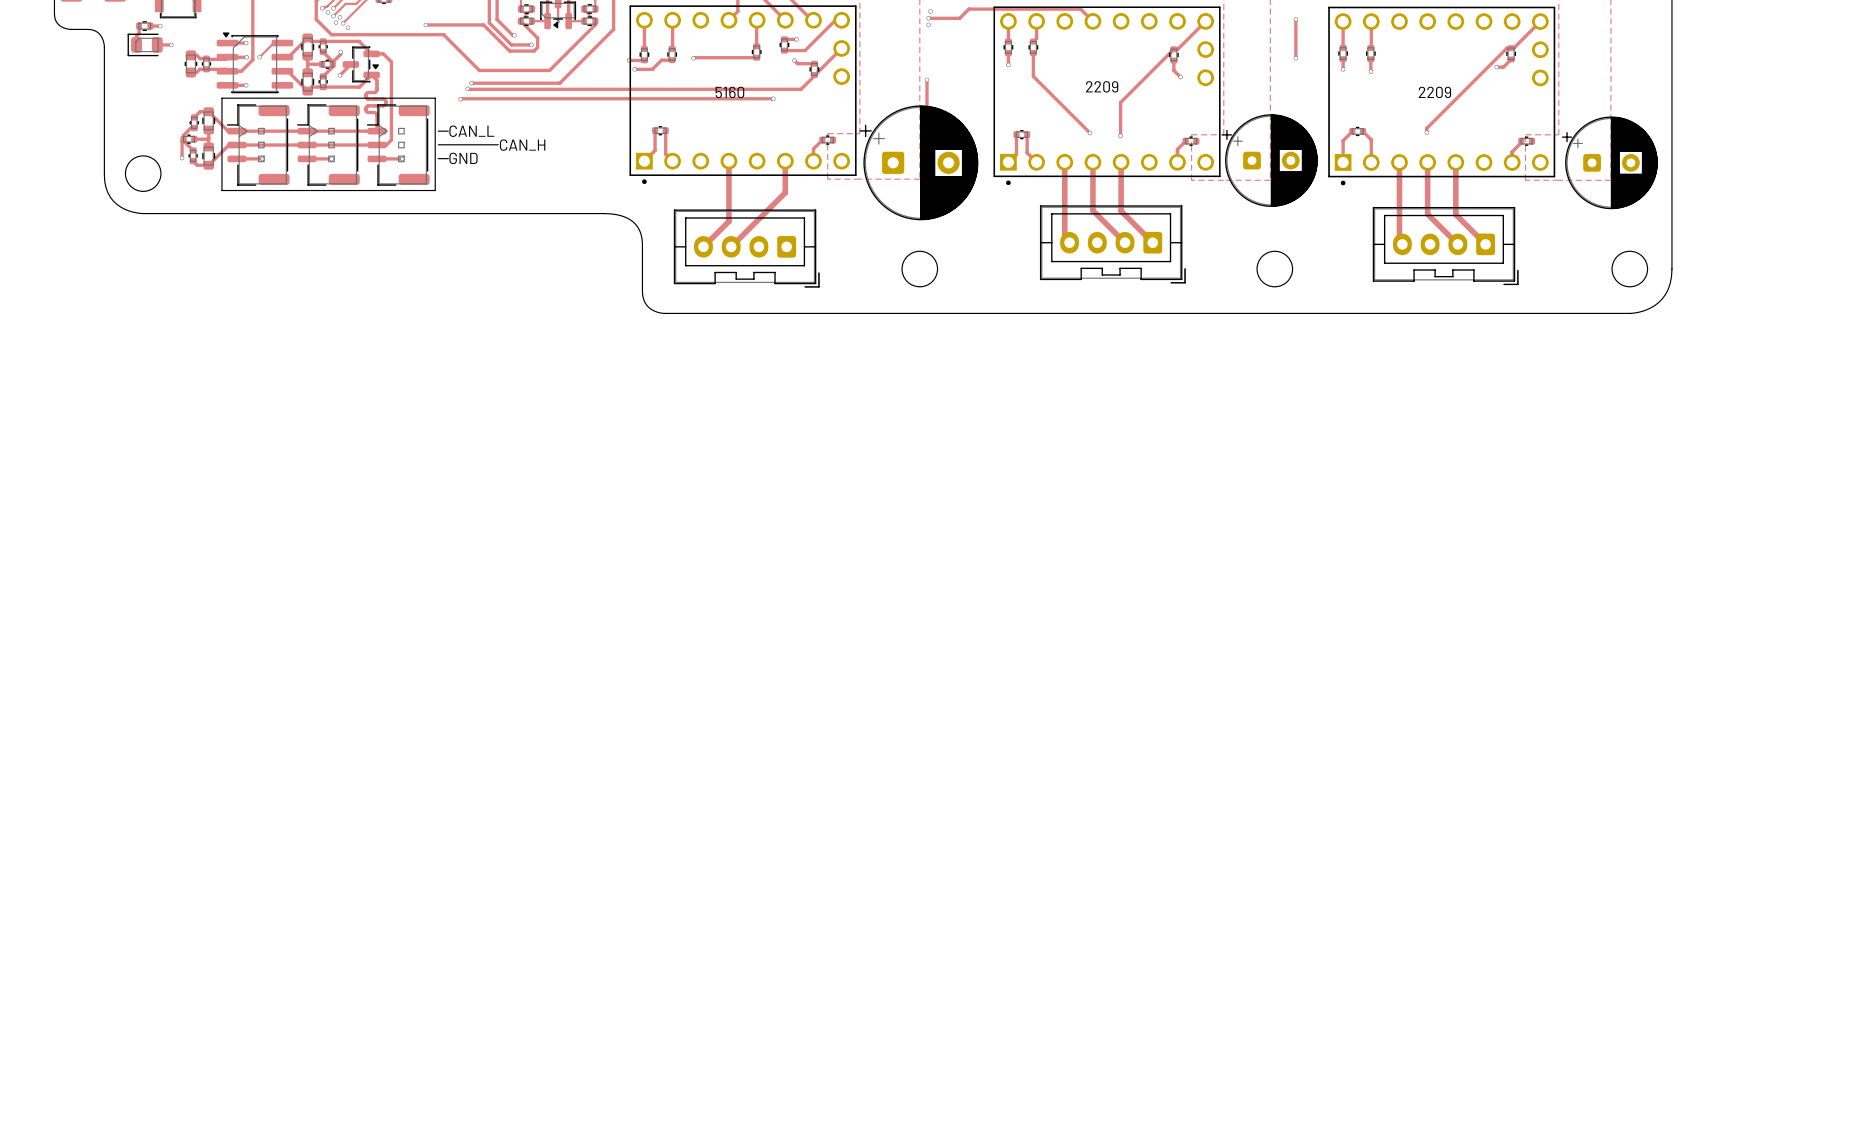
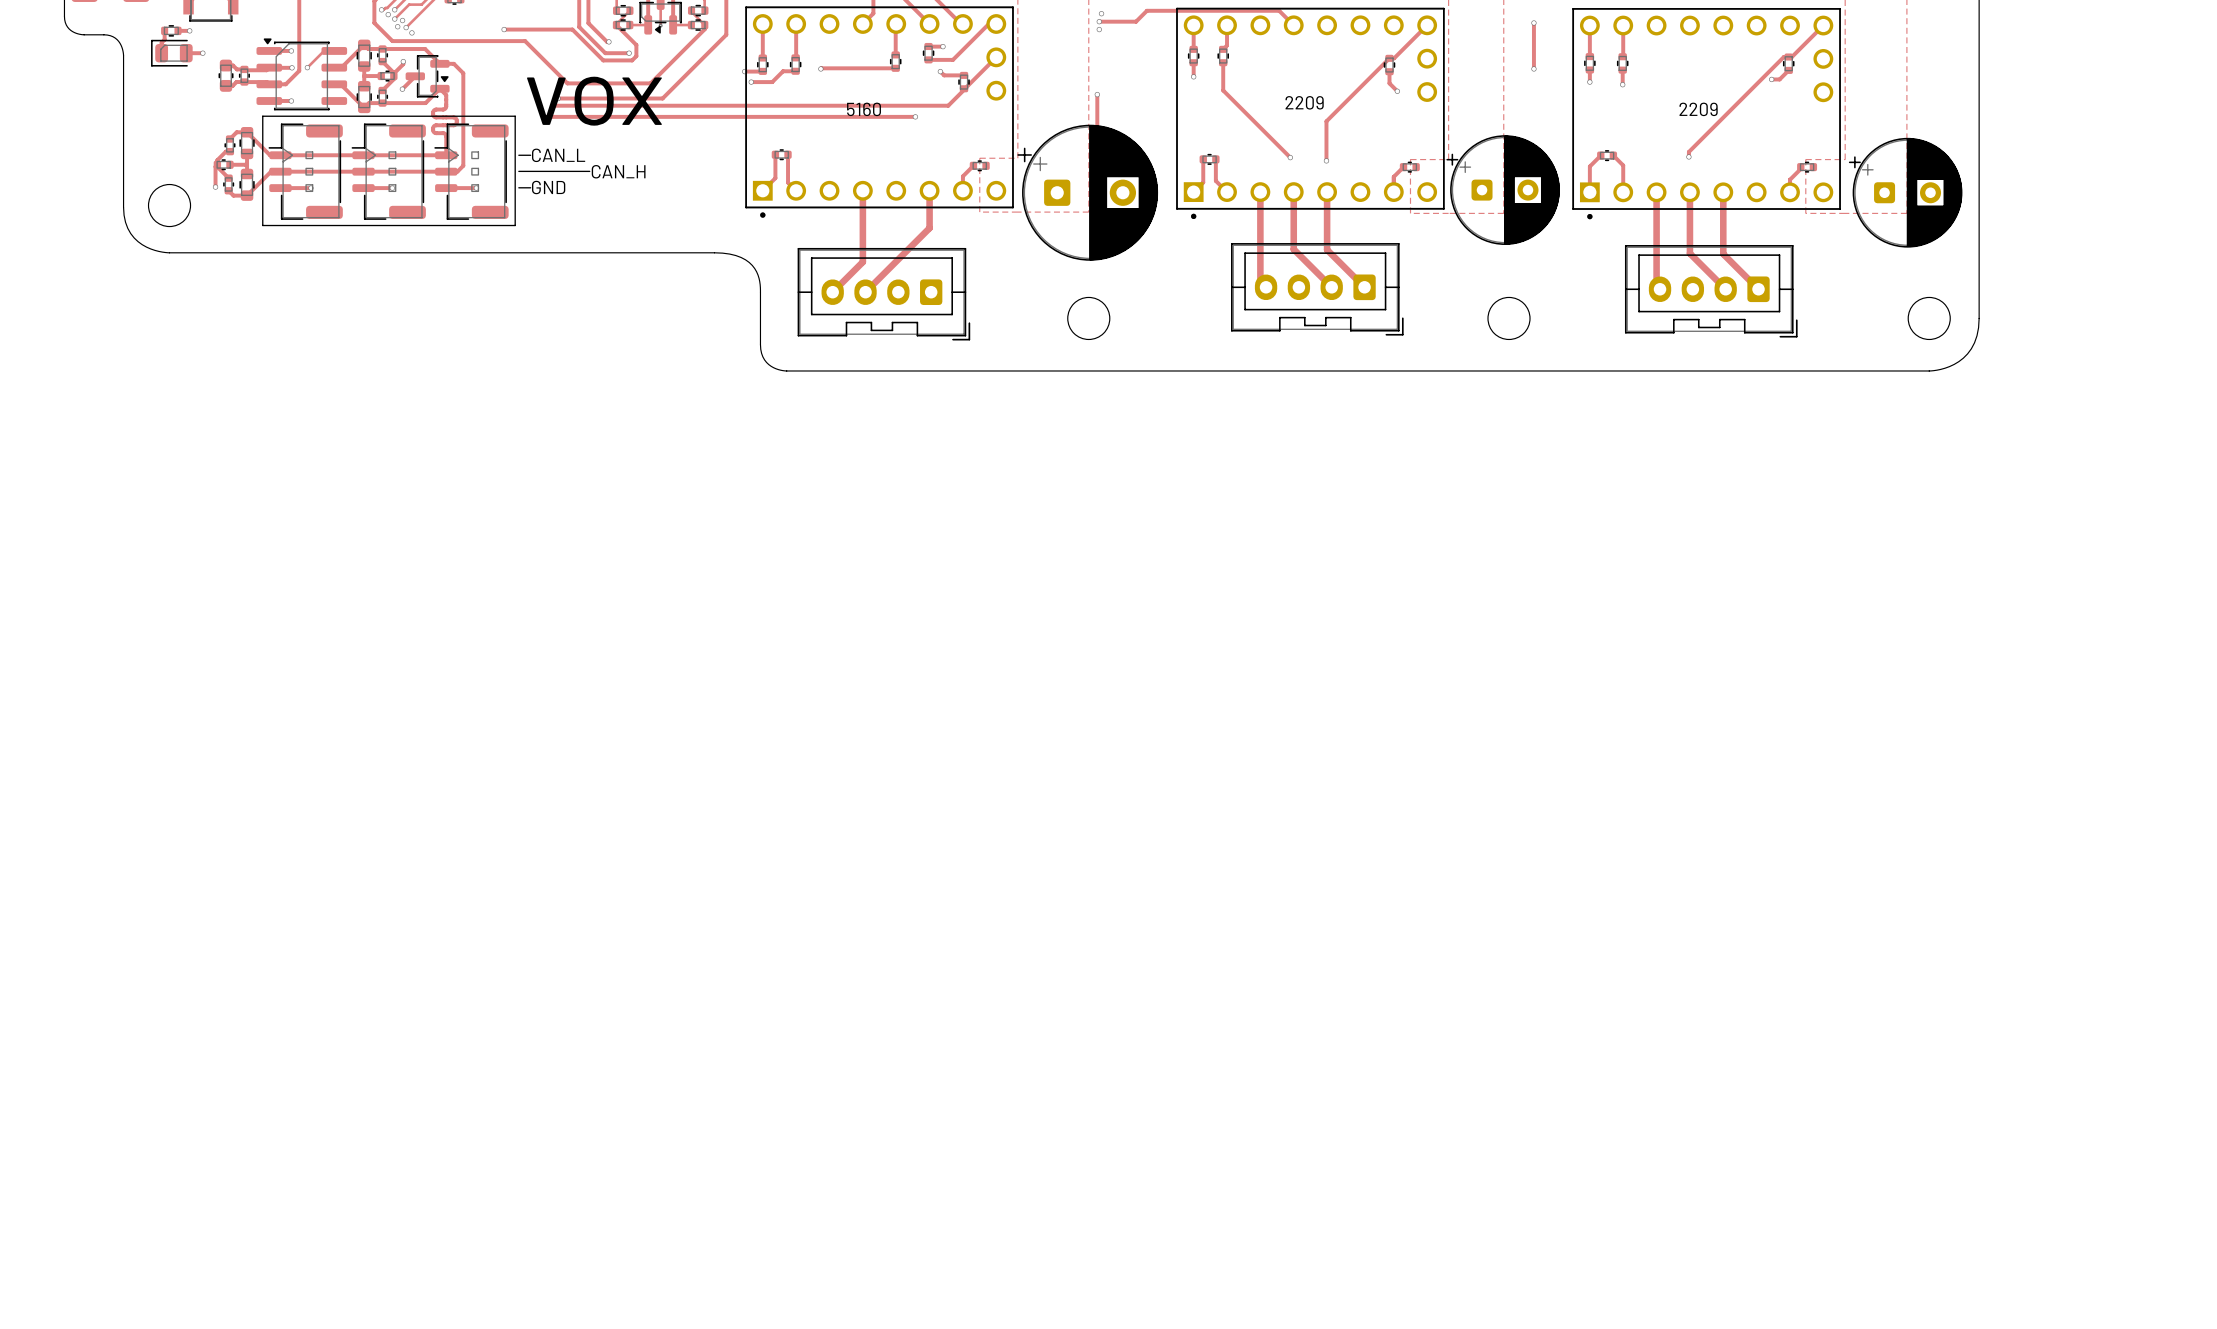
text: none -> vox (594, 101)

